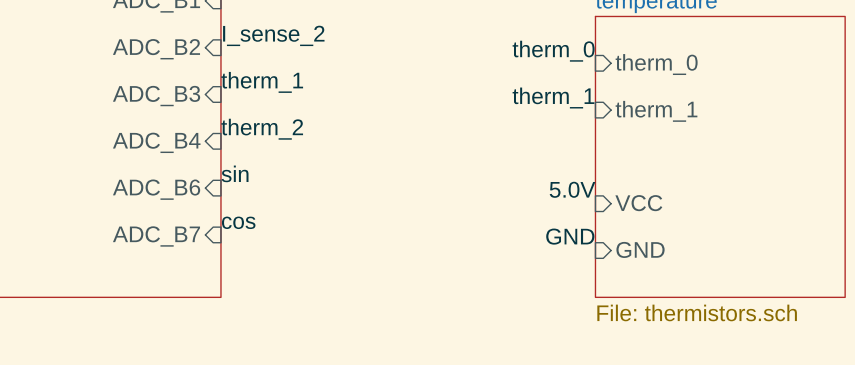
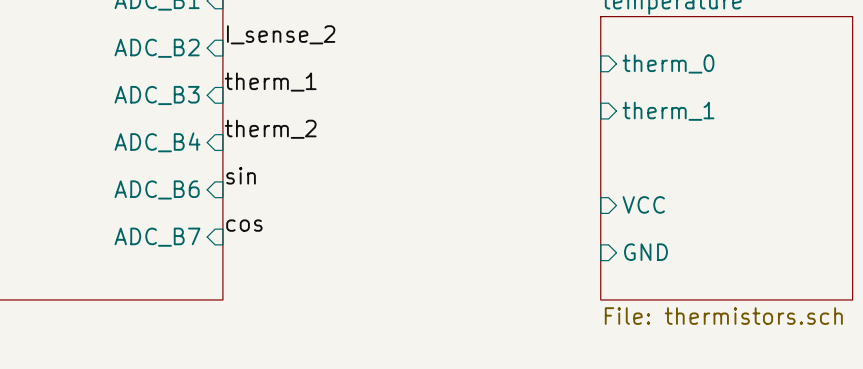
label: therm_0 (553, 51) -> none
label: therm_1 (553, 98) -> none
label: 5.0V (572, 189) -> none
label: GND (570, 236) -> none

